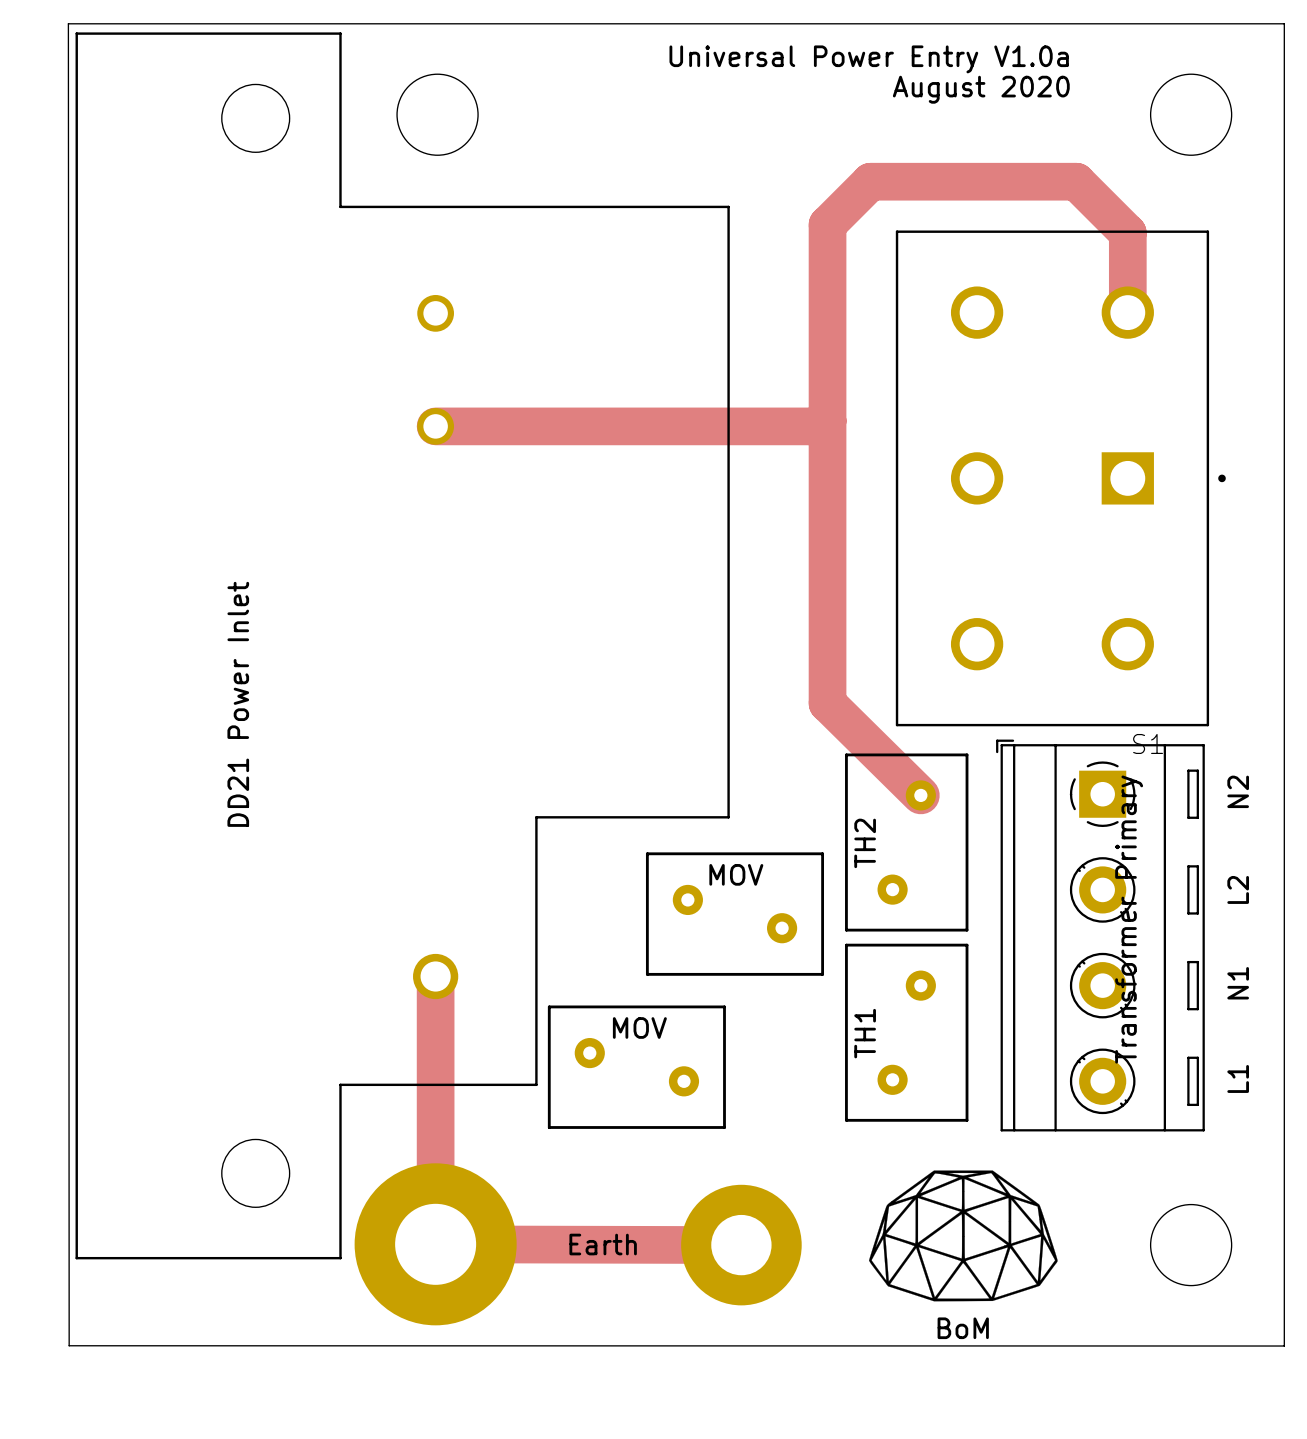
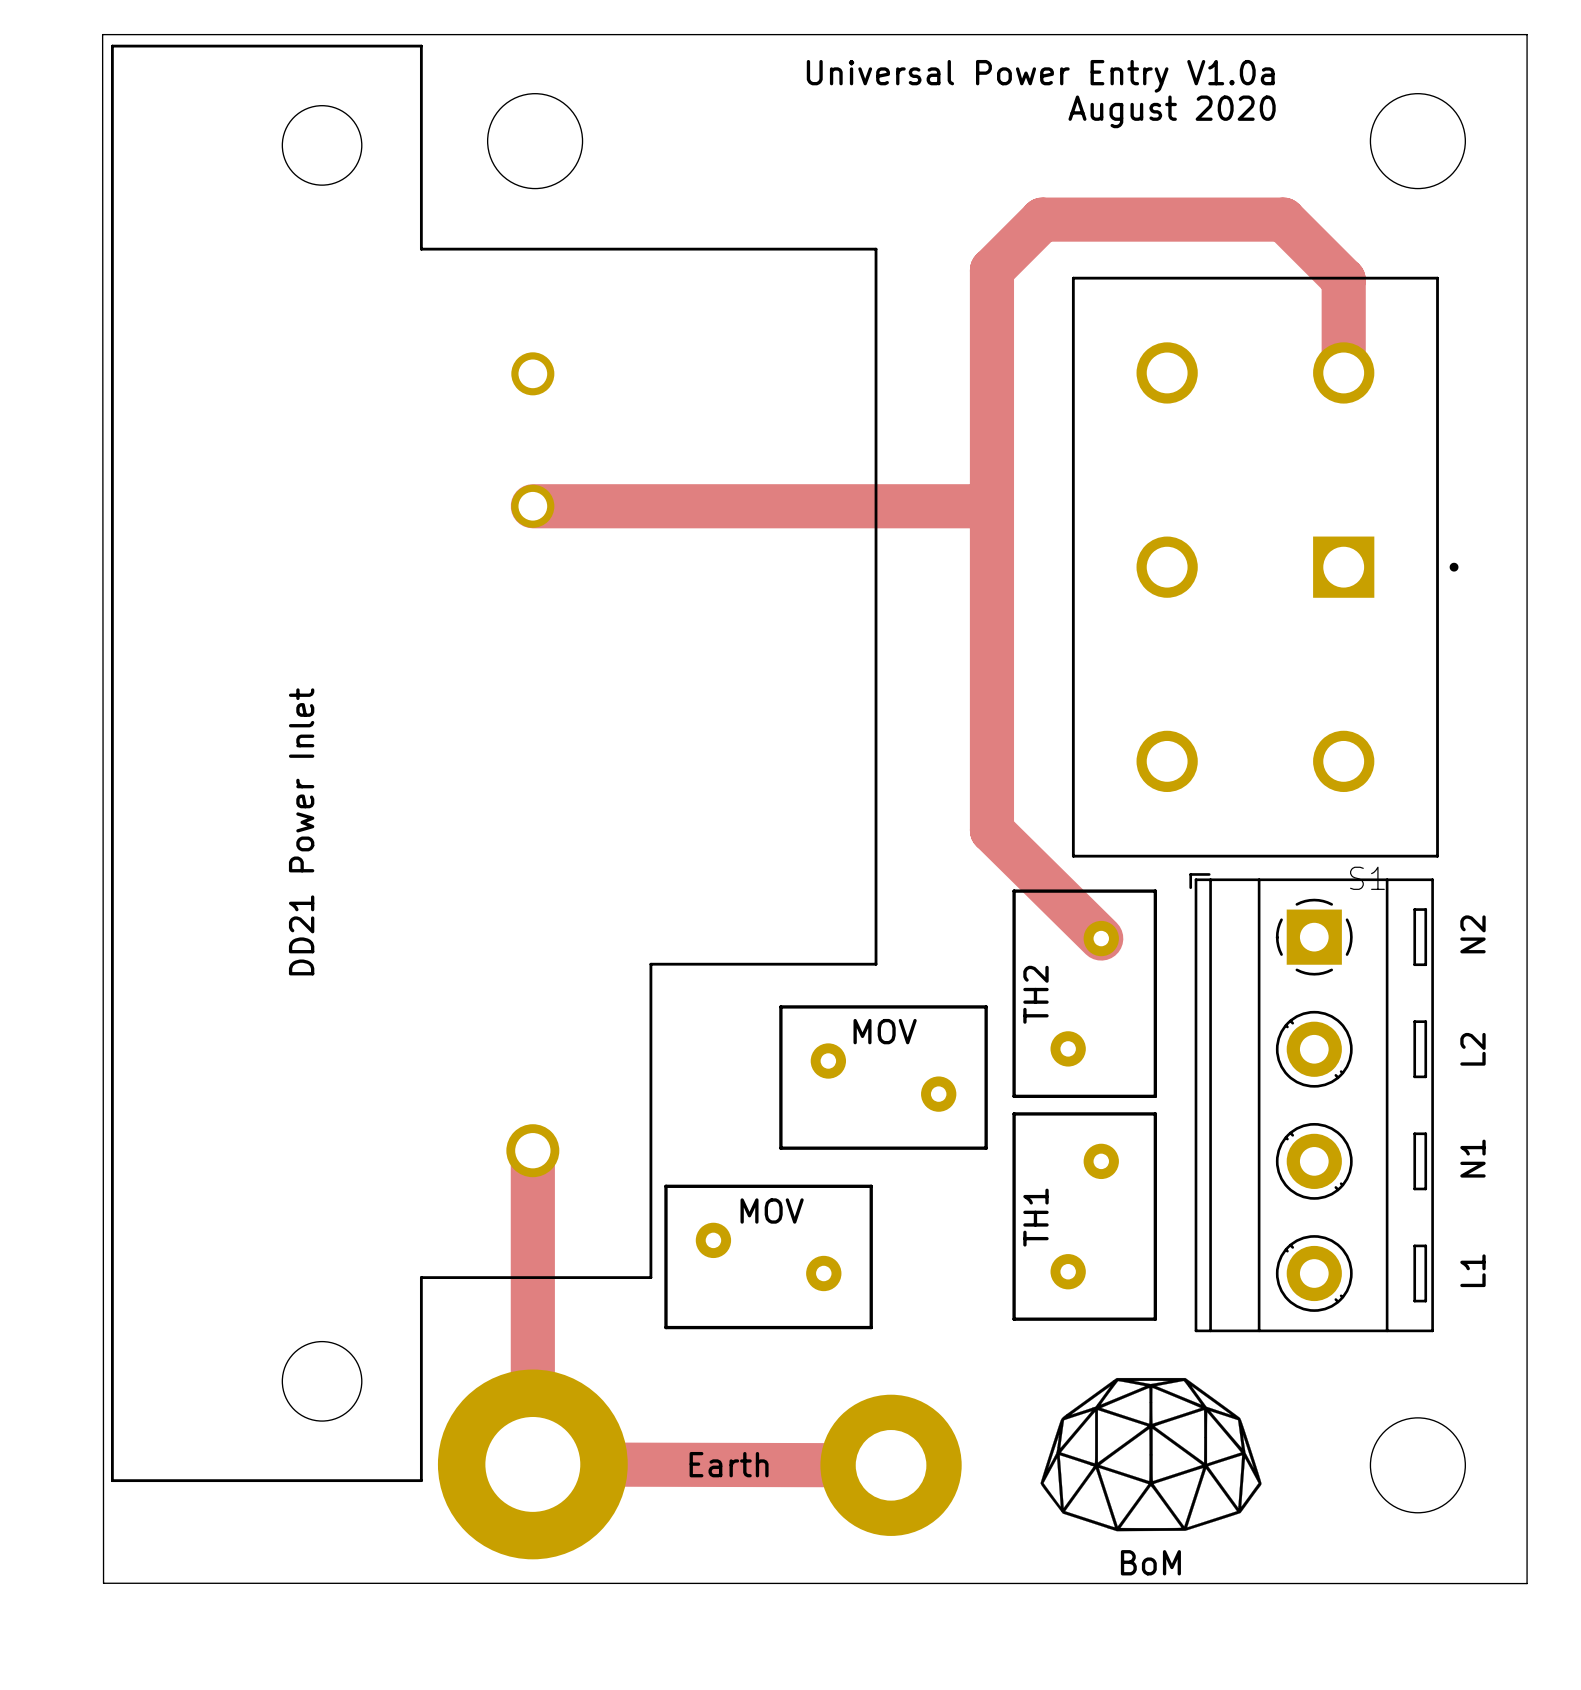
part value: Transformer Primary (1129, 919) -> none

